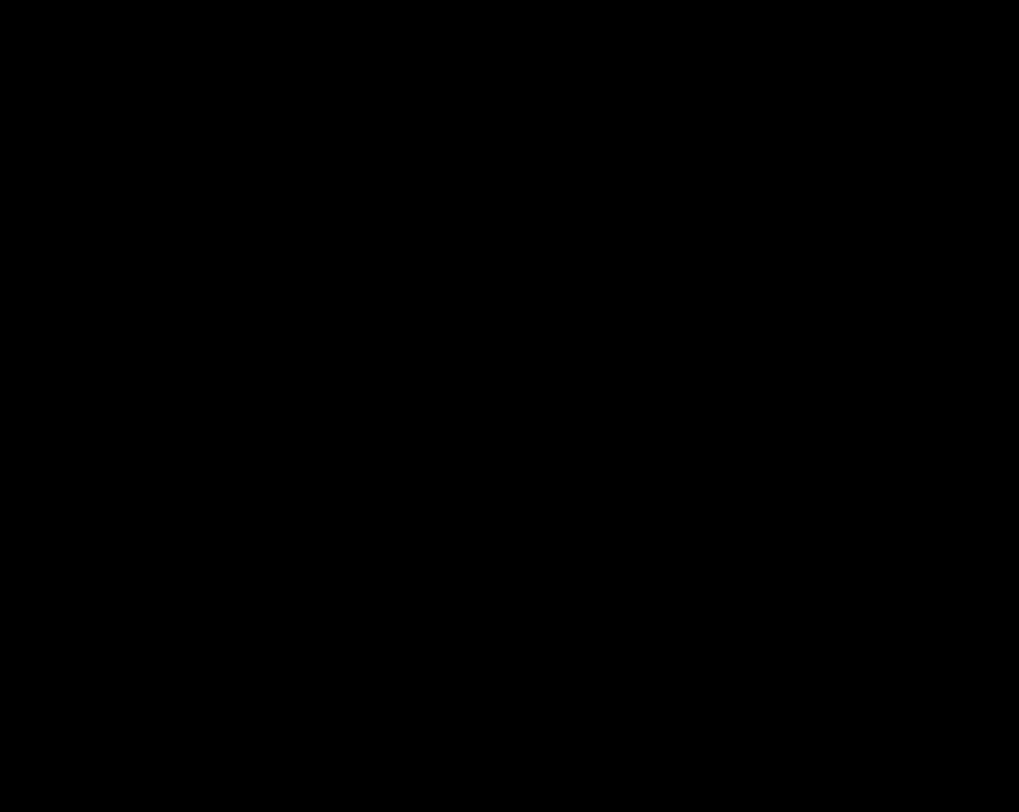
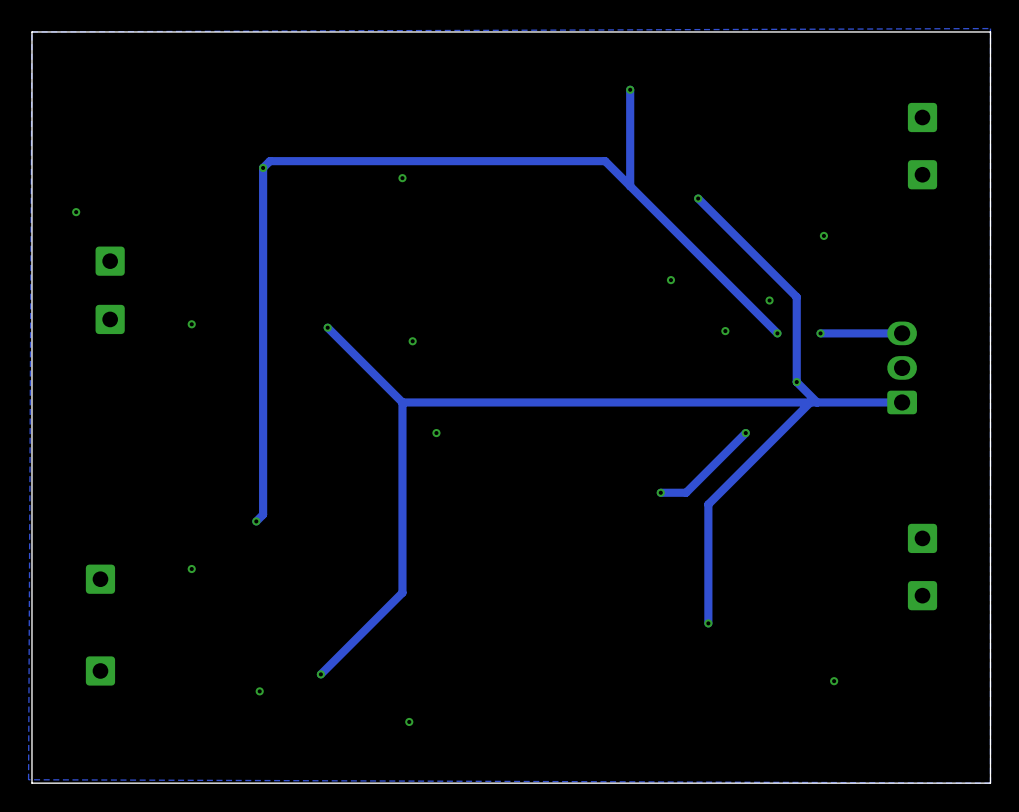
zone outline: none -> (990, 28) (990, 783) (28, 779) (31, 31) (990, 28)
board edge: none -> (990, 31) (31, 31) (31, 783) (990, 783) (990, 31)
track: none -> (630, 89) (630, 186)
via: none -> (630, 89)
part: none -> (922, 117)
via: none -> (263, 167)
part: none -> (922, 174)
via: none -> (402, 178)
track: none -> (698, 198) (796, 297) (796, 382) (817, 402)
via: none -> (698, 198)
via: none -> (76, 212)
via: none -> (823, 235)
part: none -> (110, 261)
via: none -> (670, 280)
via: none -> (769, 300)
part: none -> (110, 319)
via: none -> (191, 324)
track: none -> (327, 327) (402, 402)
via: none -> (327, 327)
via: none -> (725, 331)
track: none -> (777, 333) (605, 161) (269, 161) (263, 167) (263, 514) (256, 521)
via: none -> (777, 333)
via: none -> (820, 333)
track: none -> (902, 333) (820, 333)
via: none -> (412, 341)
part: none -> (902, 367)
via: none -> (796, 382)
track: none -> (402, 402) (402, 592) (320, 674)
track: none -> (810, 402) (708, 504) (708, 623)
track: none -> (902, 402) (402, 402)
via: none -> (436, 433)
track: none -> (745, 433) (686, 492) (660, 492)
via: none -> (745, 433)
via: none -> (660, 492)
via: none -> (256, 521)
part: none -> (922, 538)
via: none -> (191, 569)
part: none -> (100, 579)
part: none -> (922, 595)
via: none -> (708, 623)
part: none -> (100, 670)
via: none -> (320, 674)
via: none -> (834, 681)
via: none -> (259, 691)
via: none -> (409, 721)

